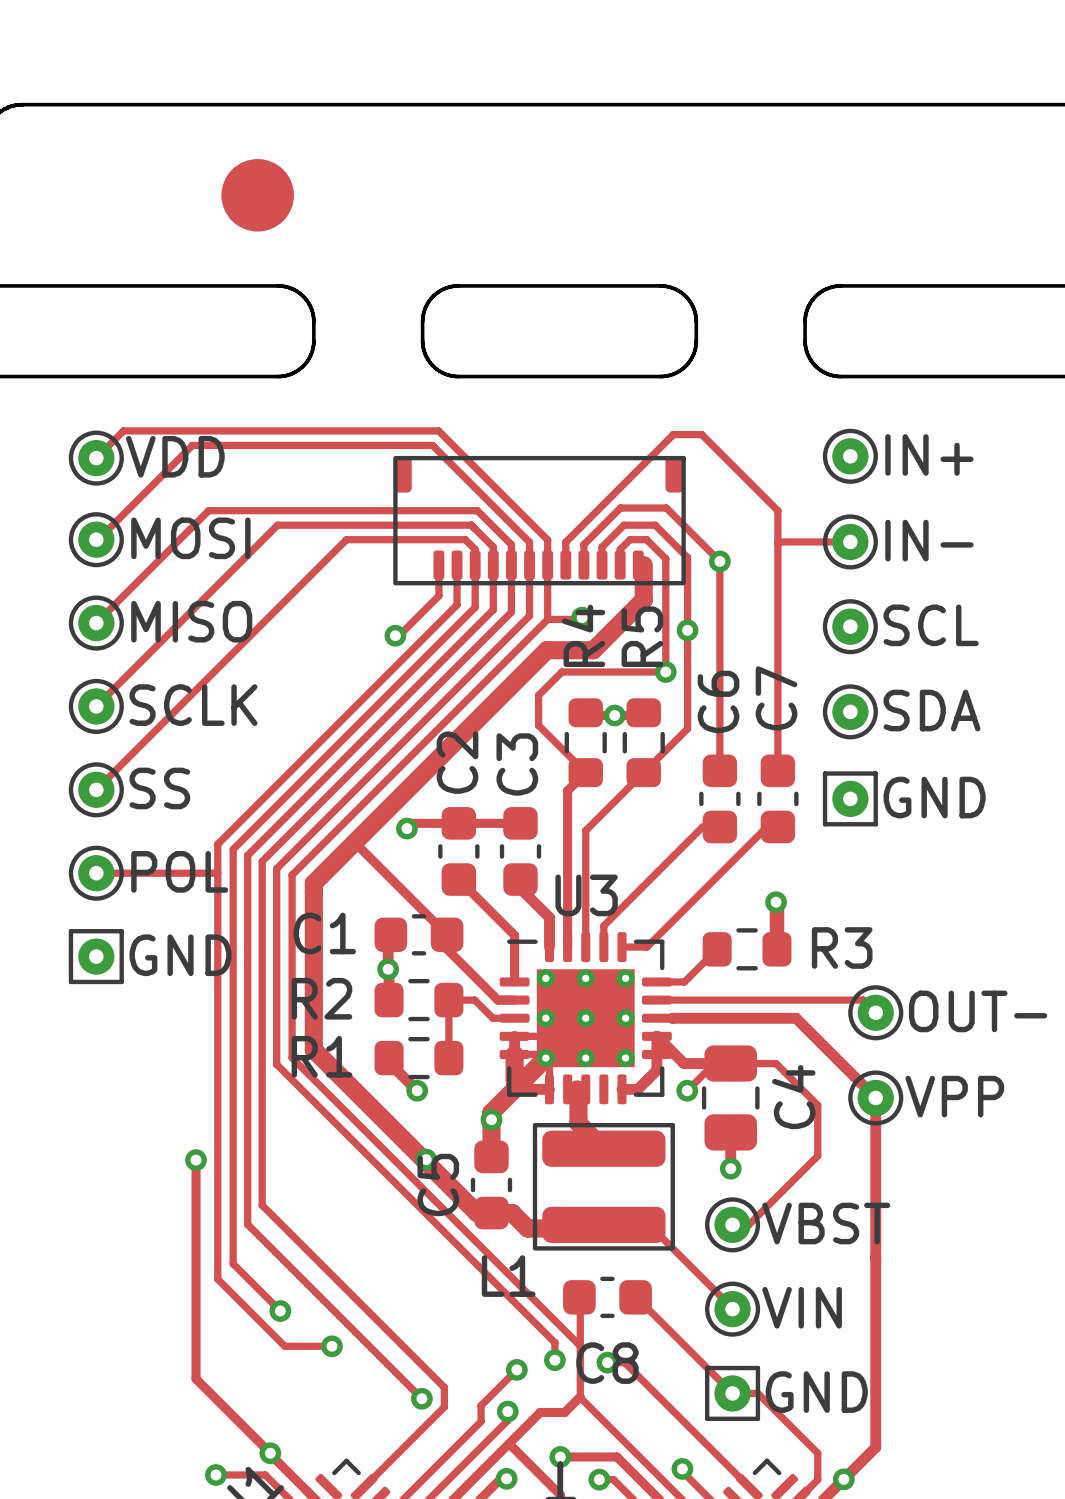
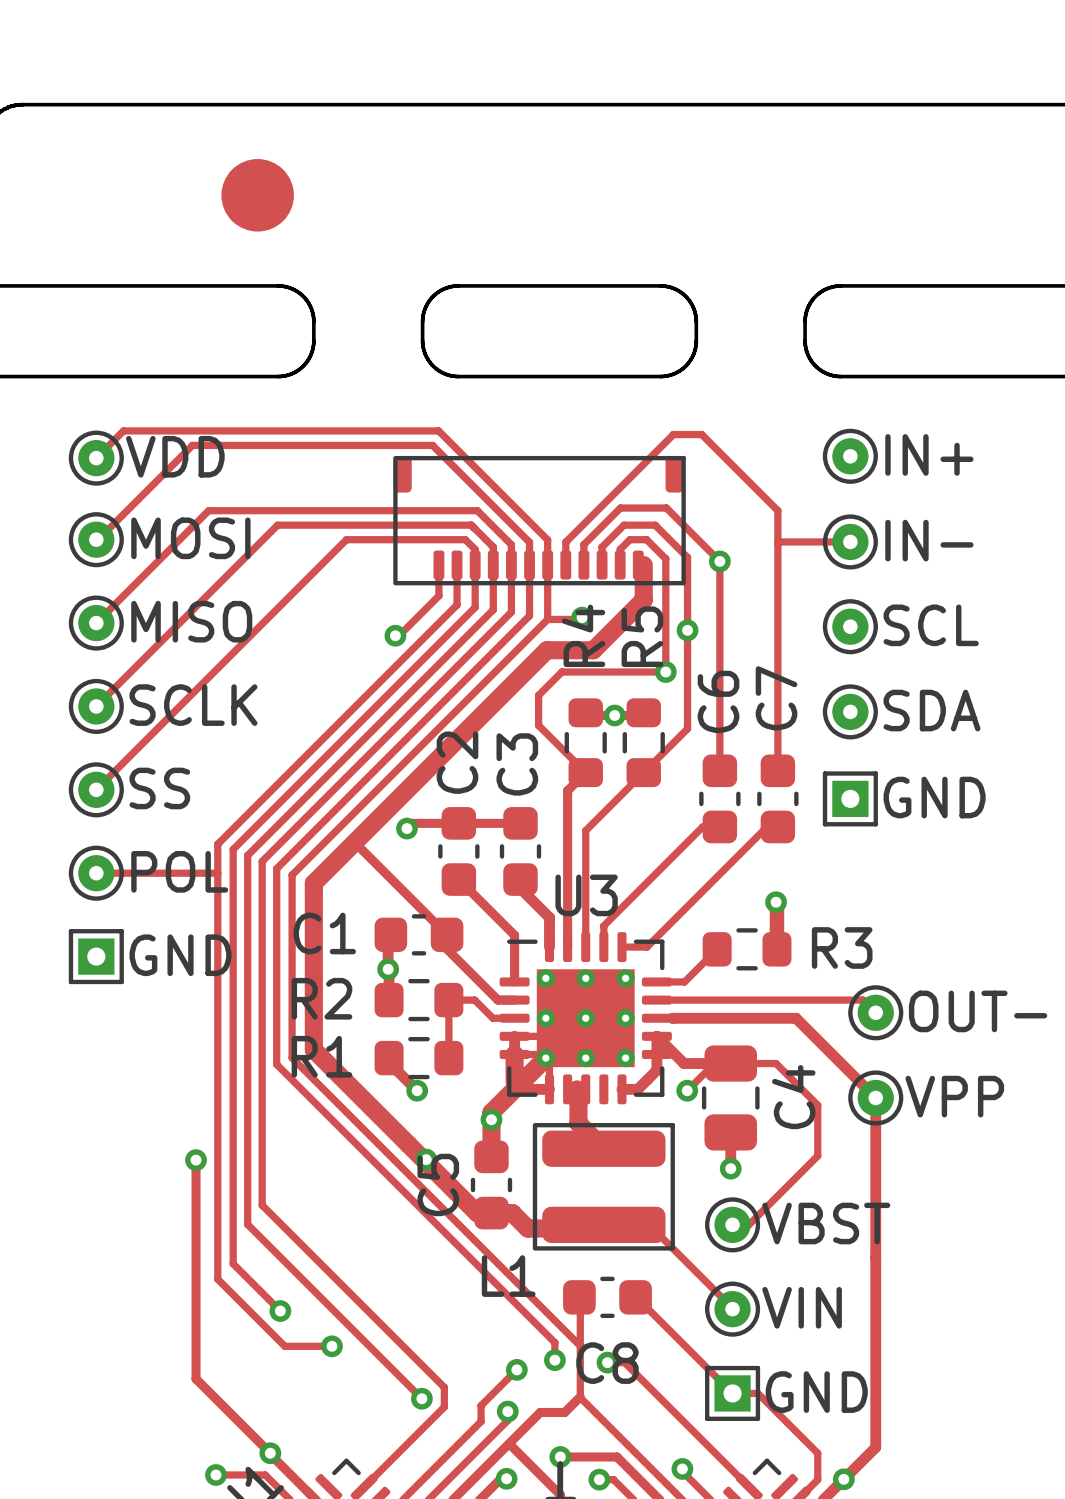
part footprint: [822, 771, 878, 827] -> [822, 771, 878, 827]
part footprint: [68, 929, 124, 985] -> [68, 929, 124, 985]
part footprint: [705, 1365, 761, 1421] -> [705, 1365, 761, 1421]

